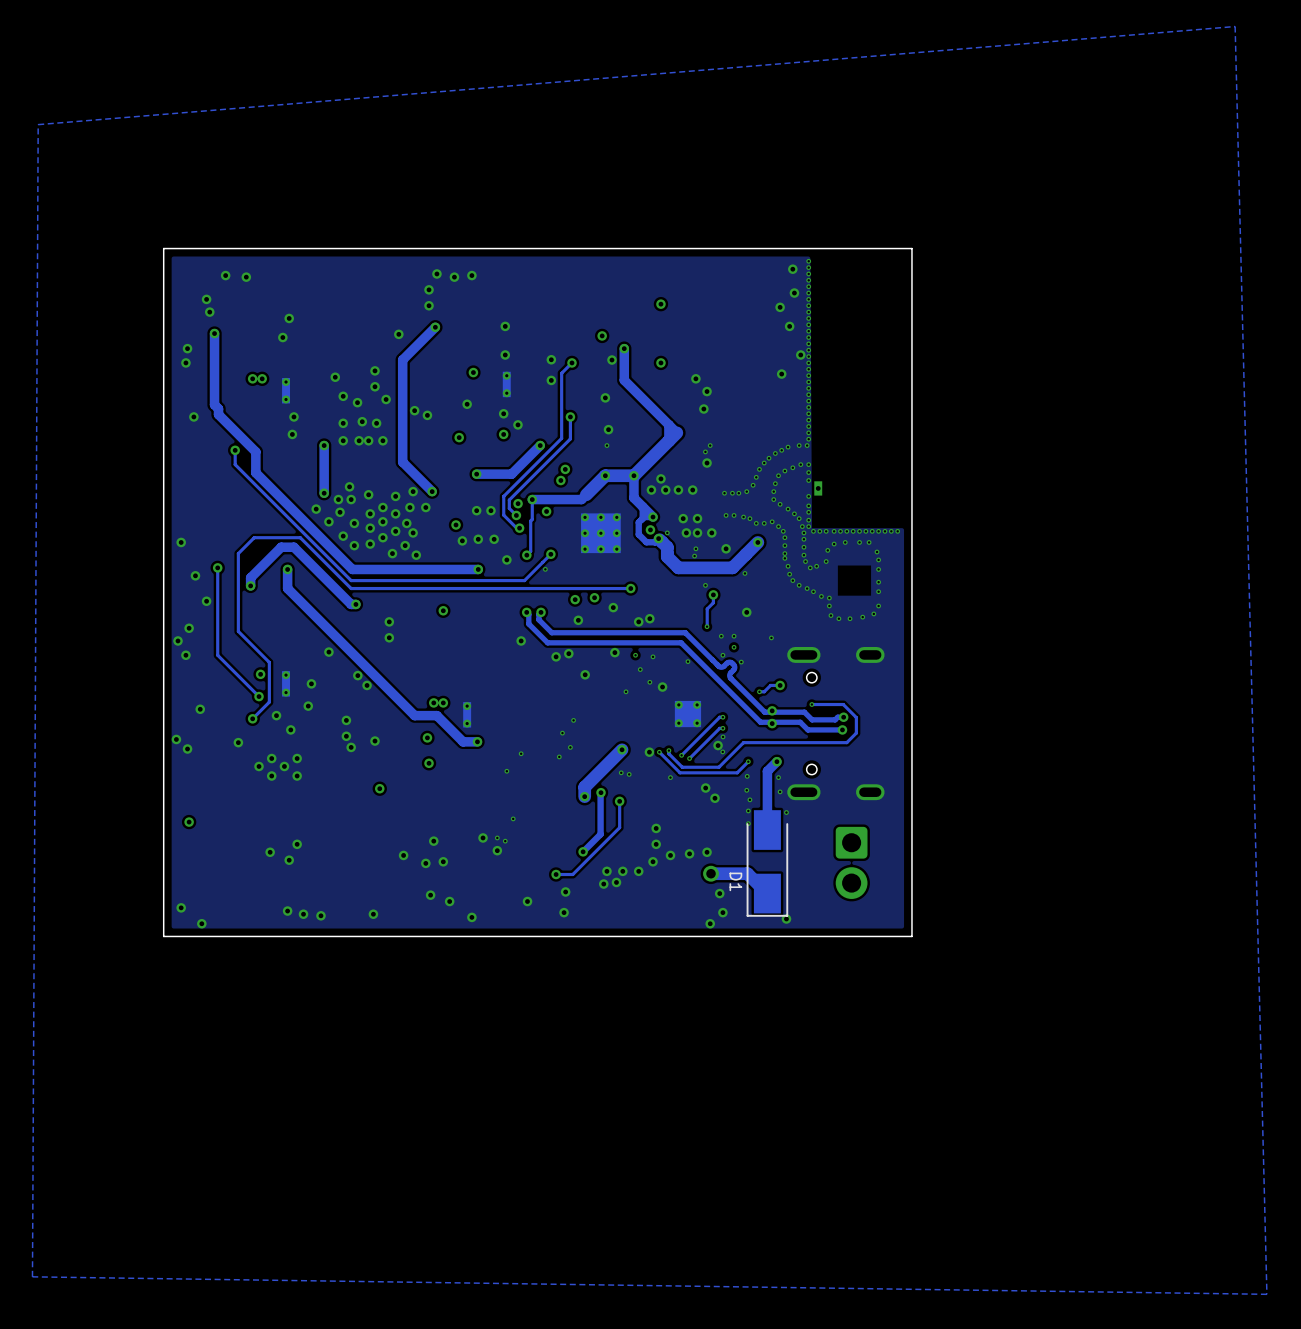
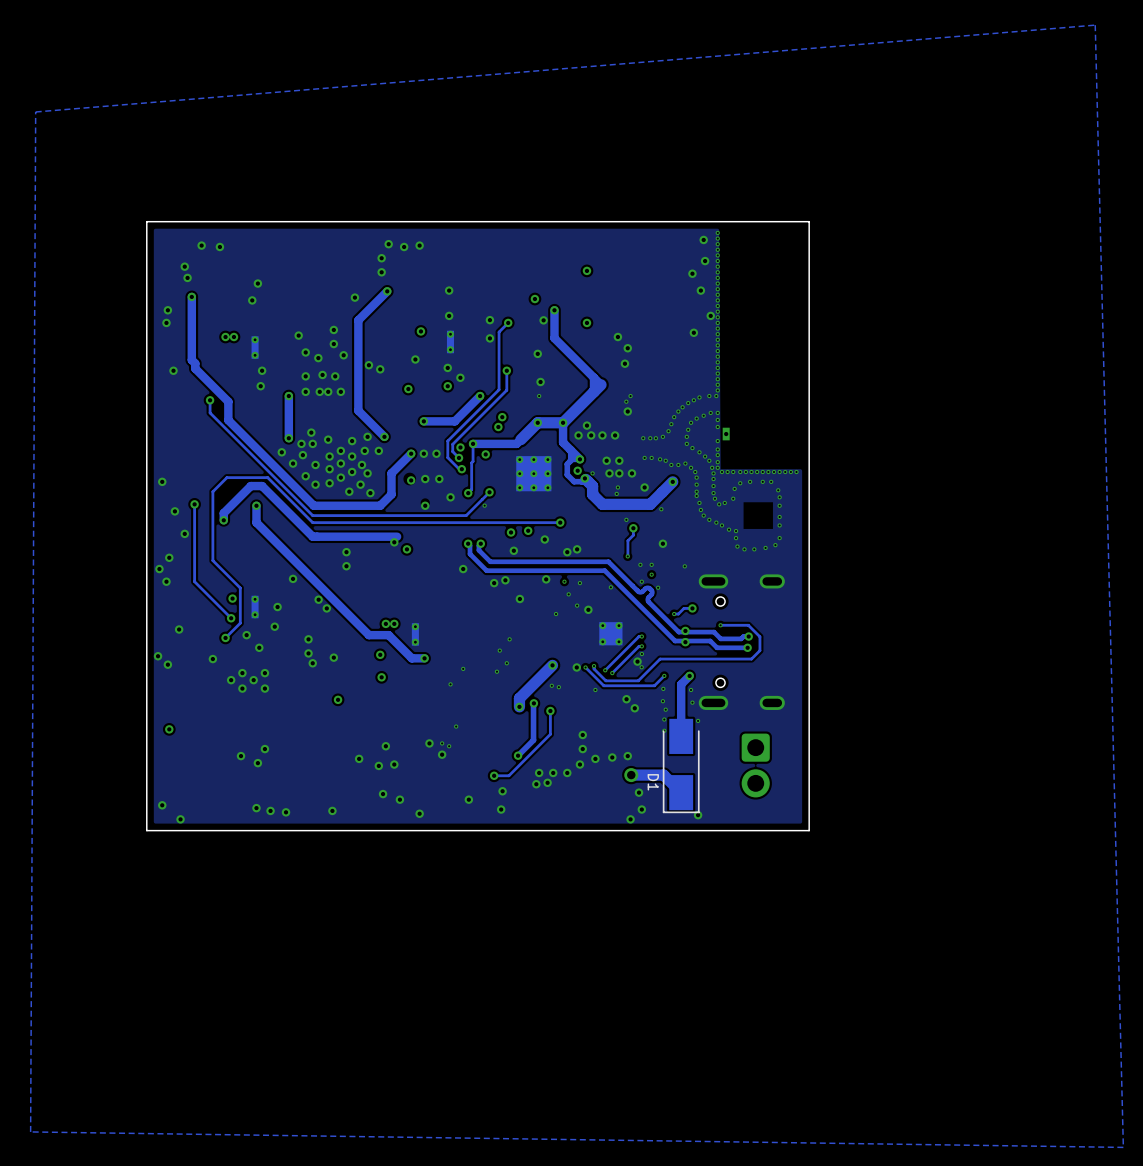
via position: (456, 524) -> (411, 453)
track: (478, 569) (427, 569) -> (411, 453) (391, 473) (391, 494) (380, 505)
via: (355, 604) -> none
track: none -> (397, 536) (316, 536)
via: none -> (406, 549)

